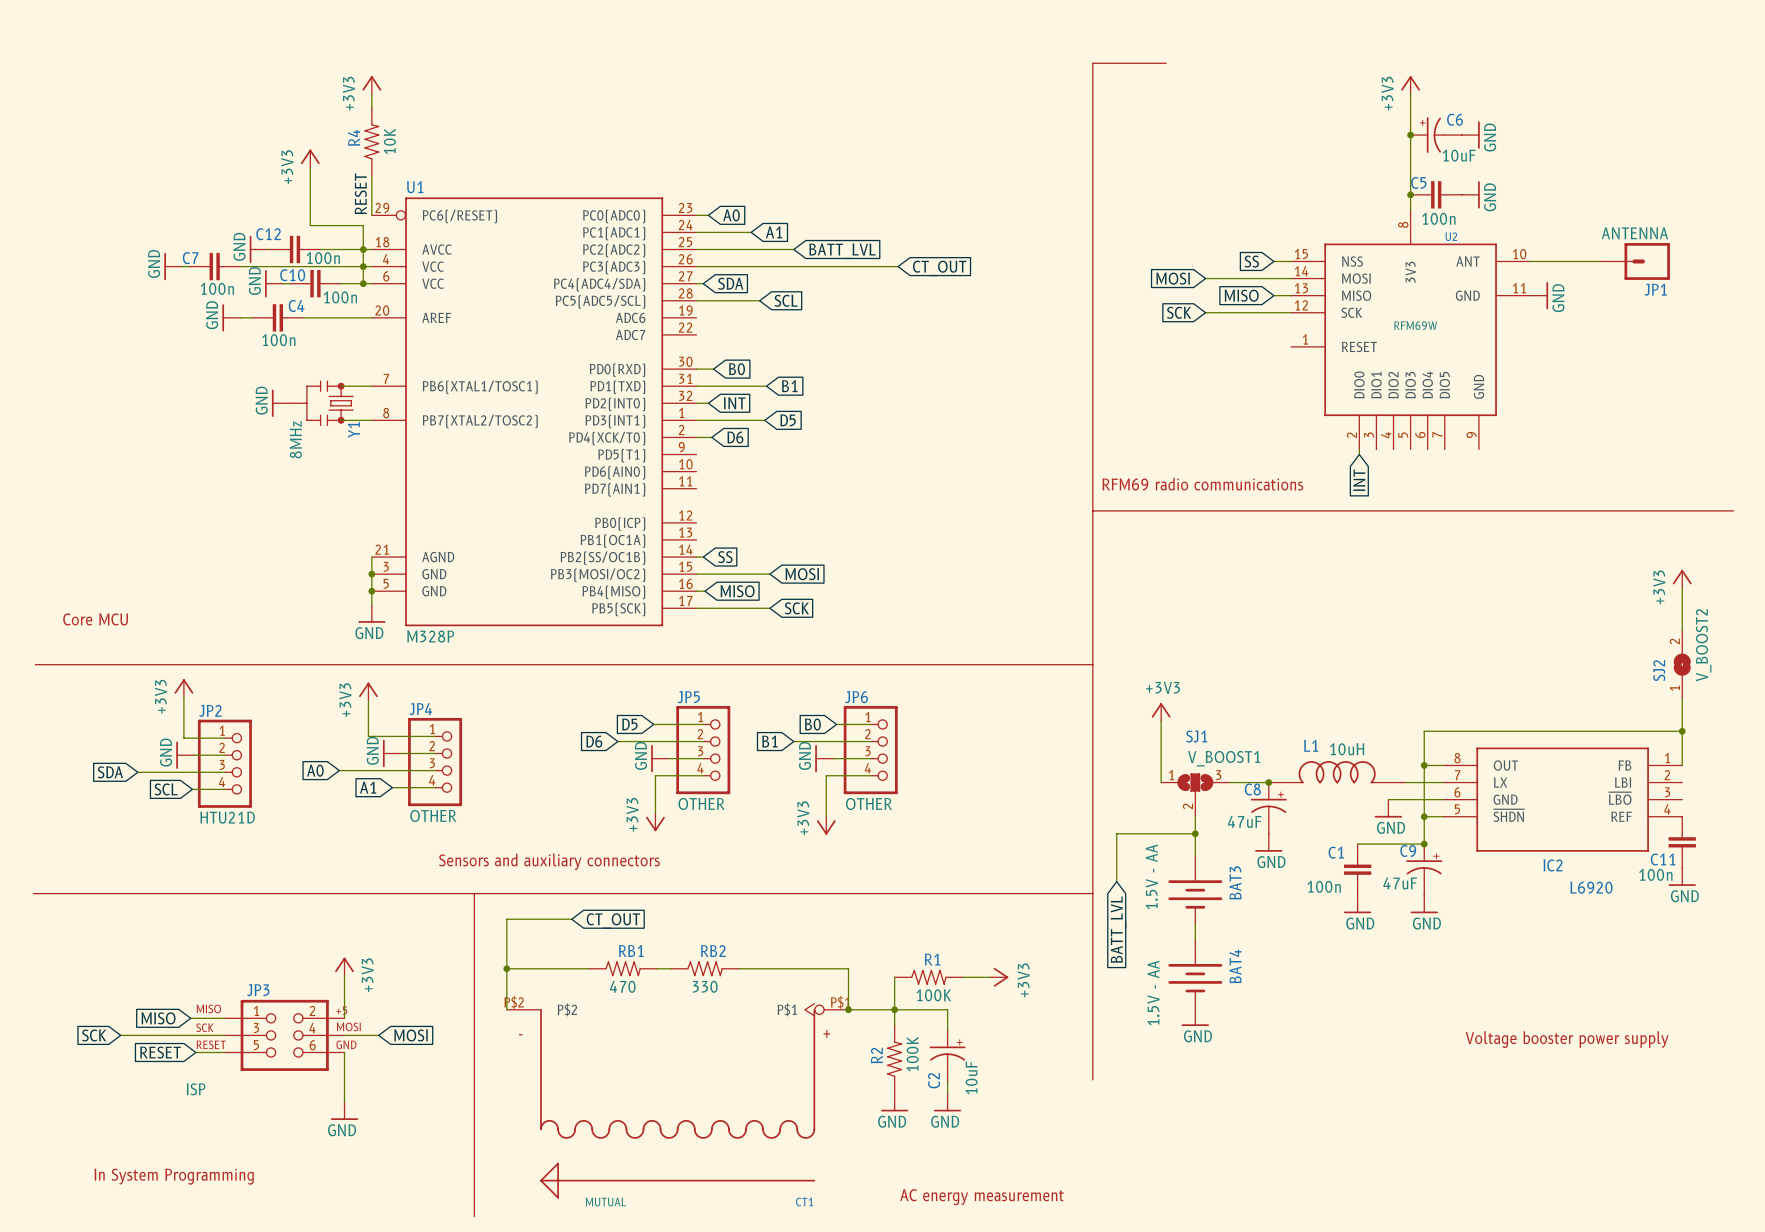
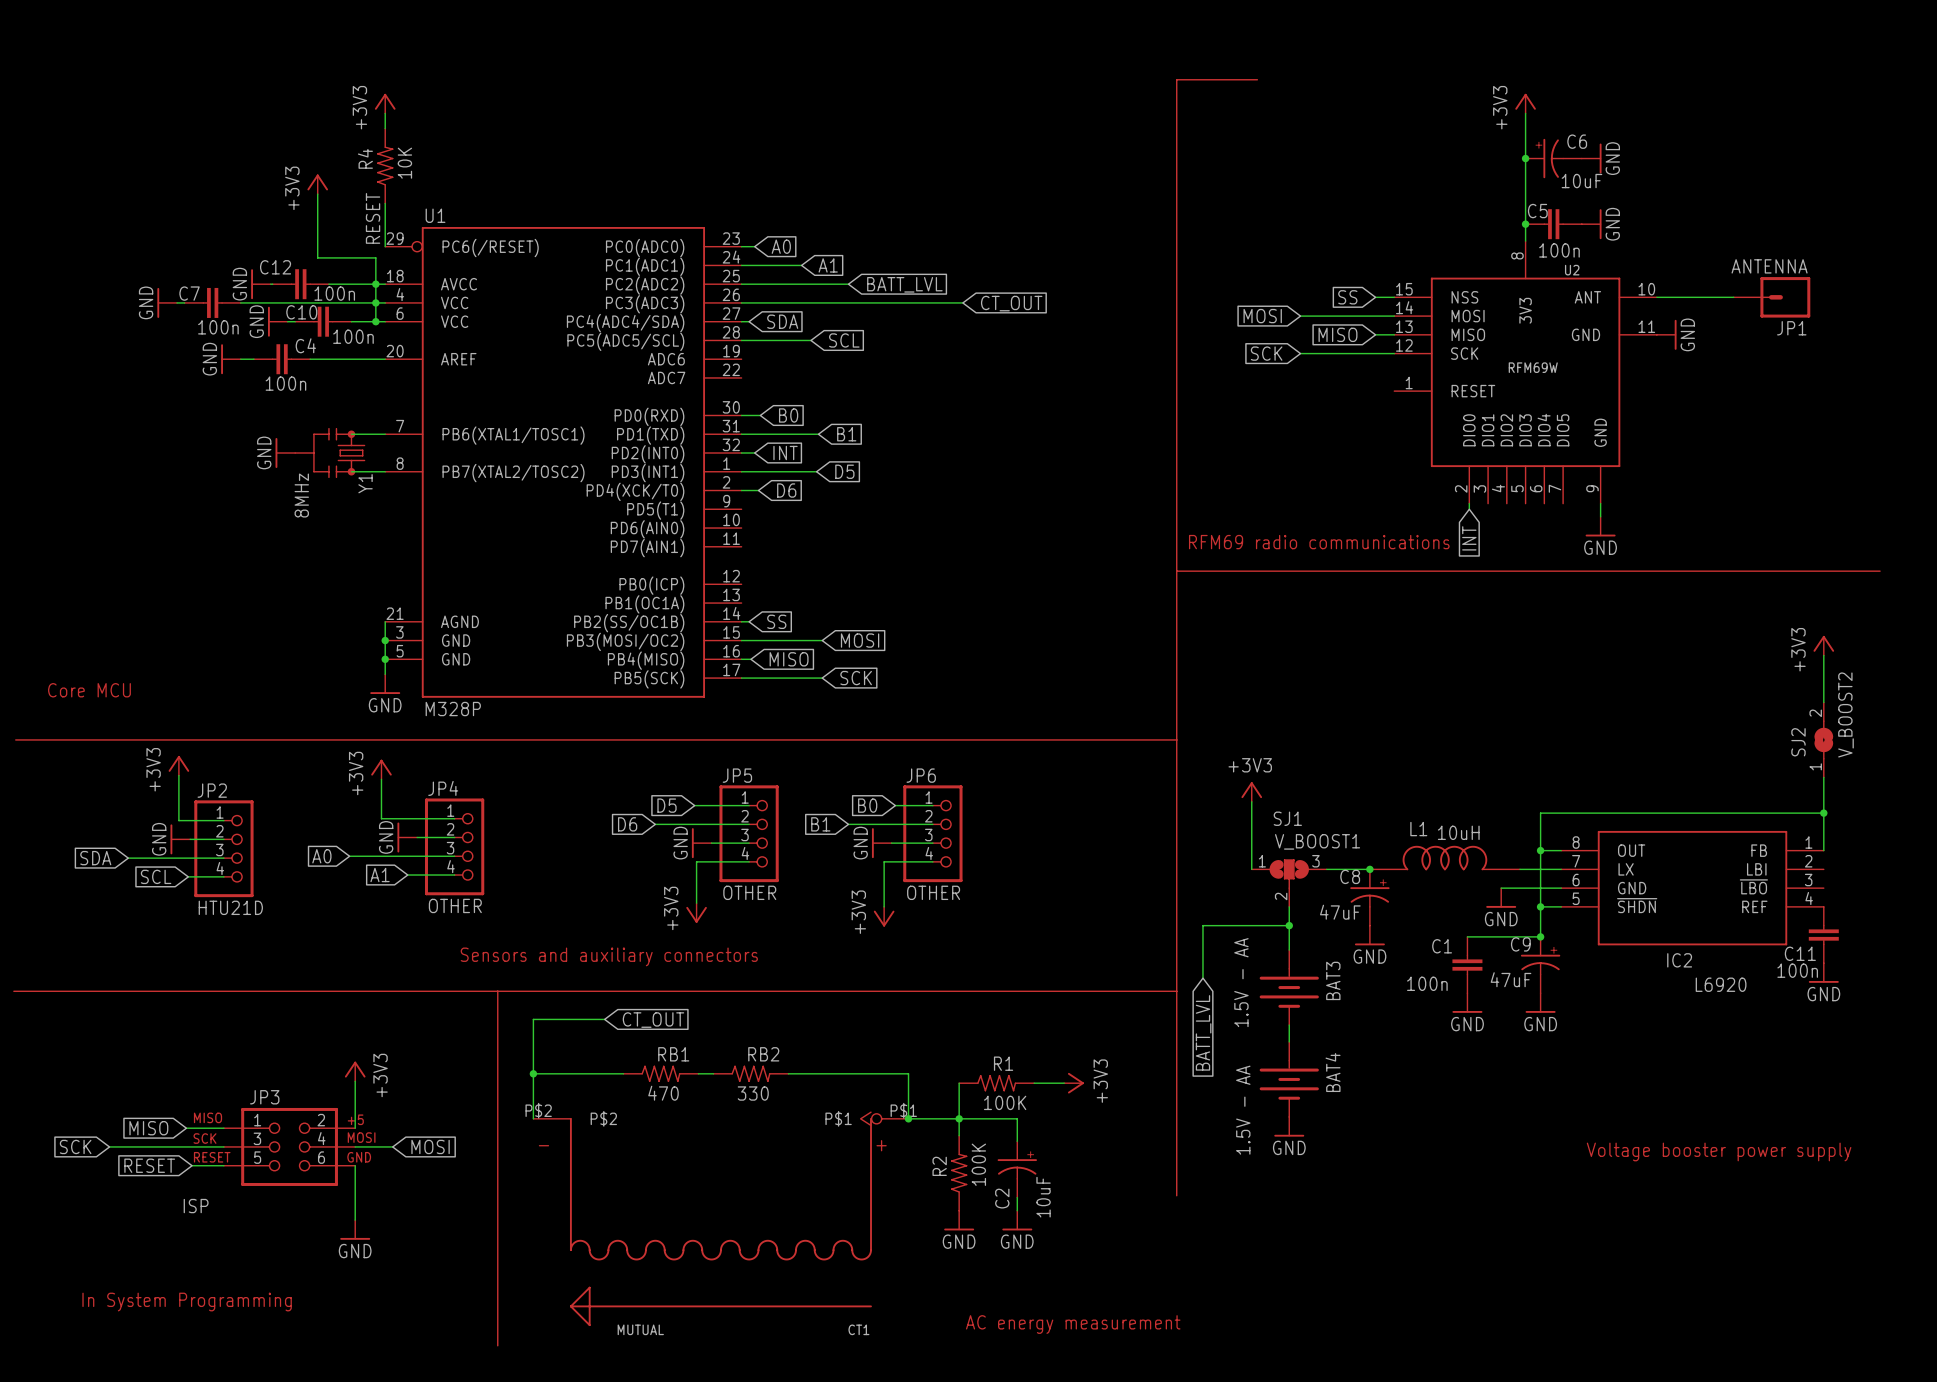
wire: none -> (1600, 503) (1600, 516)
power symbol: none -> GND (1600, 526)

